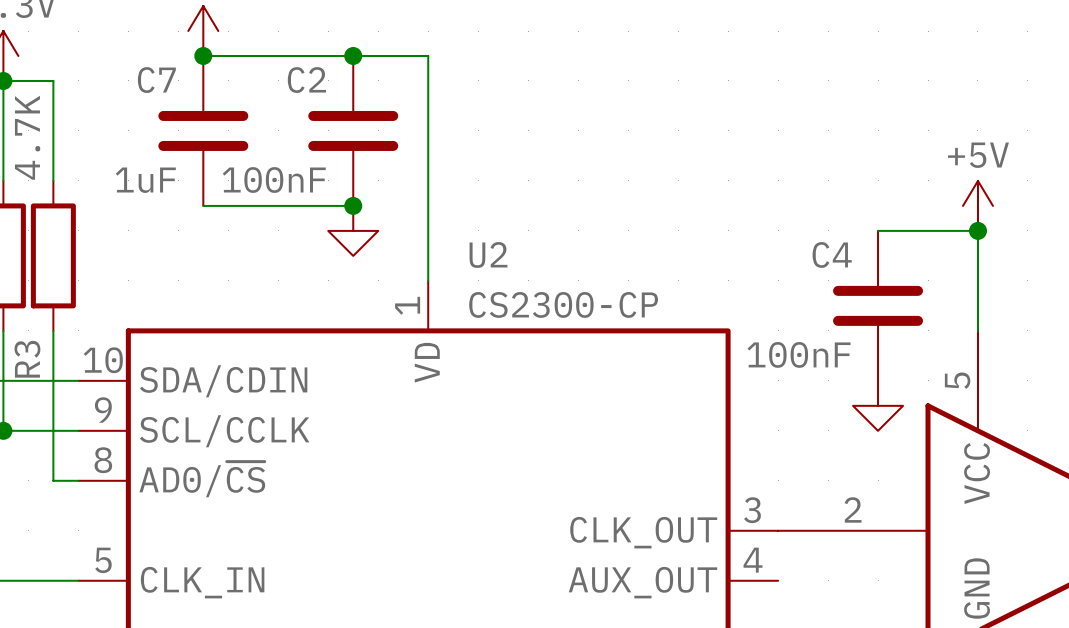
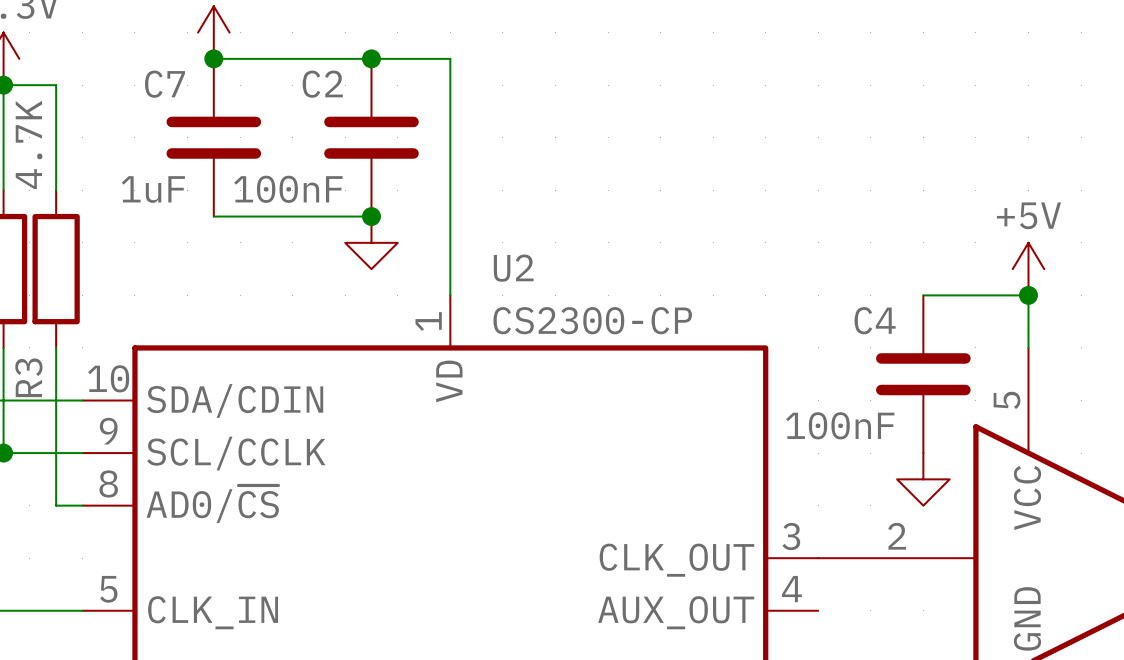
power symbol position: +5V (977, 205) -> +5V (1028, 269)
wire: (878, 230) (977, 230) (977, 280) -> (923, 295) (1028, 295)
junction position: (977, 230) -> (1028, 295)
C4 position: (878, 305) -> (923, 374)
power symbol position: (878, 405) -> (923, 479)

